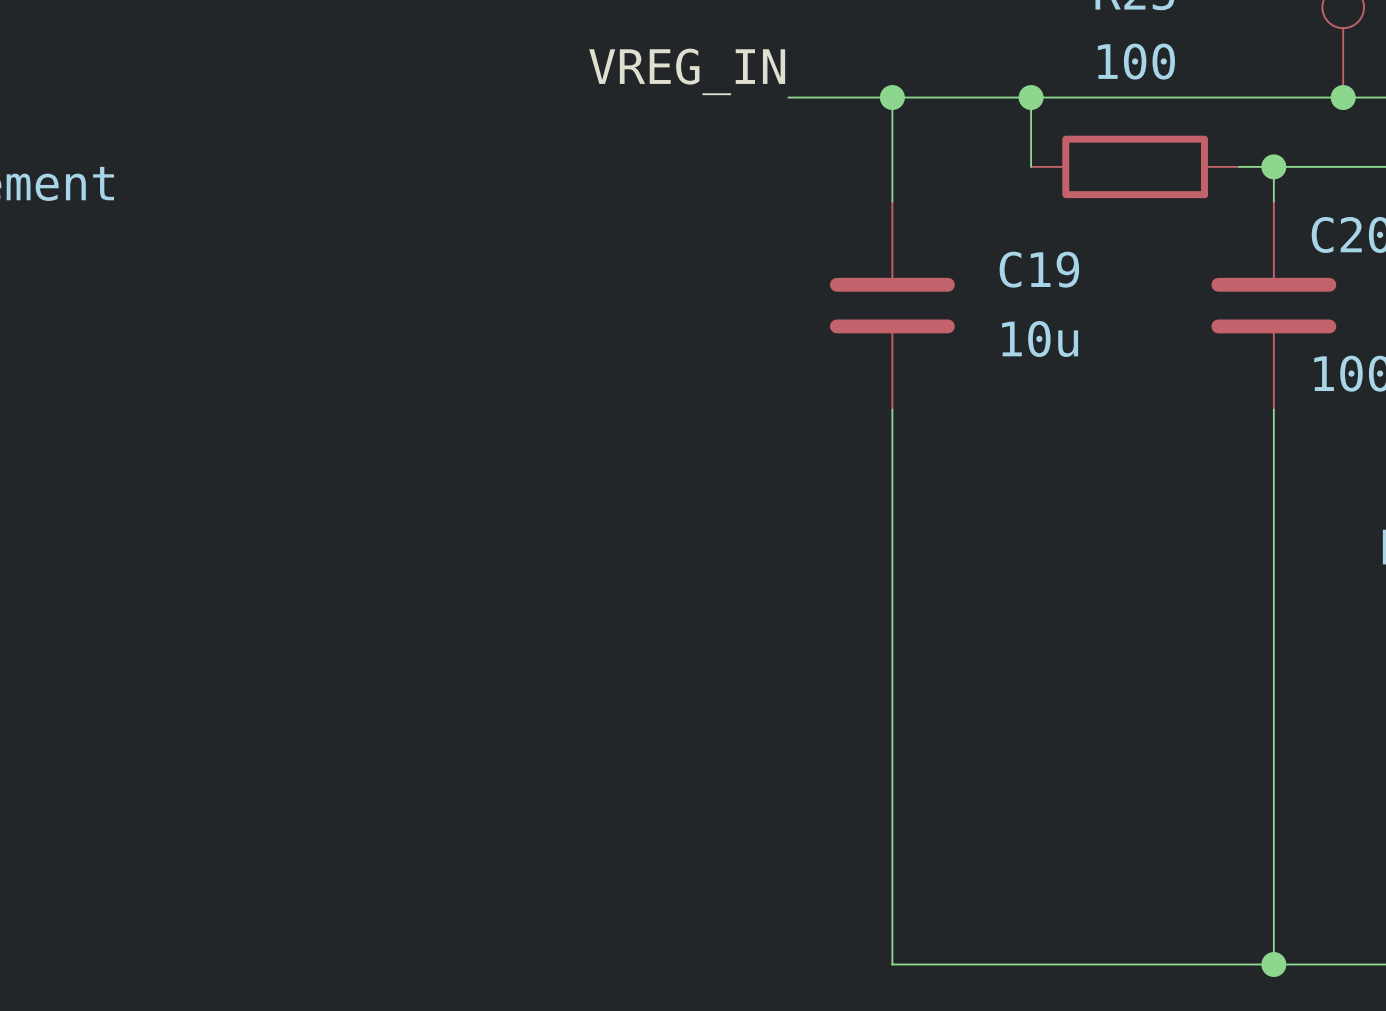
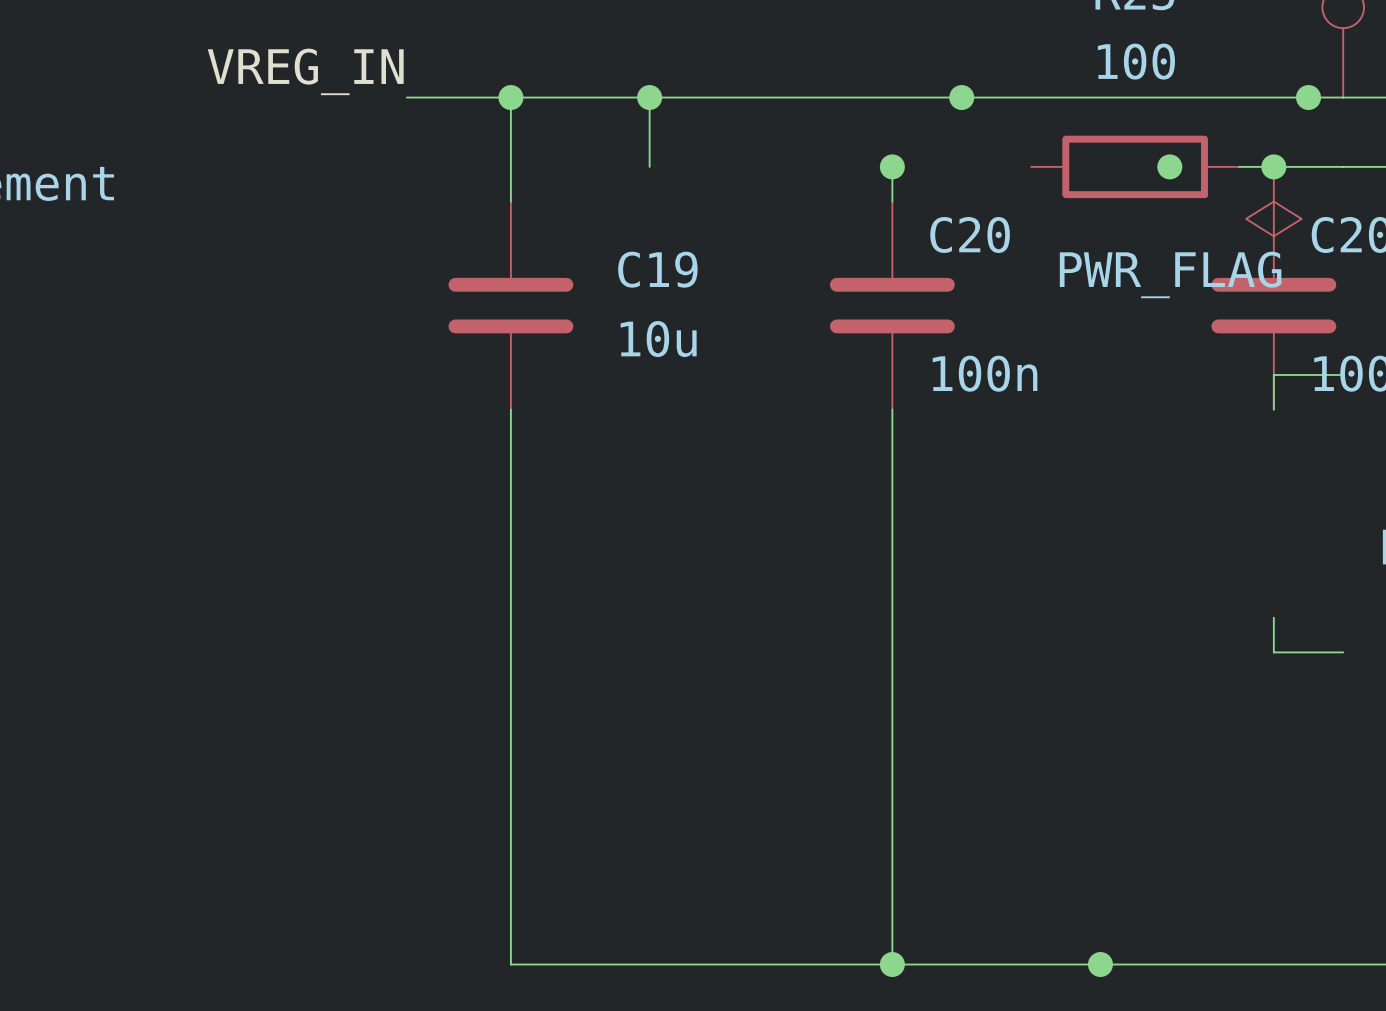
label position: VREG_IN (687, 71) -> VREG_IN (305, 71)
wire: none -> (406, 97) (788, 97)
wire: none -> (510, 97) (510, 201)
junction: none -> (510, 97)
junction: none -> (649, 97)
wire: (892, 97) (892, 166) -> none
junction: (892, 97) -> none
junction: none -> (961, 97)
wire: (1031, 97) (1031, 166) -> (649, 97) (649, 166)
junction: (1031, 97) -> none
junction position: (1343, 97) -> (1308, 97)
junction: none -> (892, 166)
junction: none -> (1169, 166)
power symbol: none -> PWR_FLAG (1273, 201)
C19 name: C19 (1039, 269) -> C20 (970, 234)
C19: none -> 10u (510, 305)
C19 value: 10u (1040, 339) -> 100n (985, 373)
wire: none -> (510, 409) (510, 964) (892, 964)
wire: (1273, 409) (1273, 617) -> (1273, 409) (1273, 374) (1343, 374)
wire: (1273, 652) (1273, 964) -> (1273, 652) (1343, 652)
junction: none -> (892, 964)
junction: none -> (1100, 964)
junction: (1273, 964) -> none

